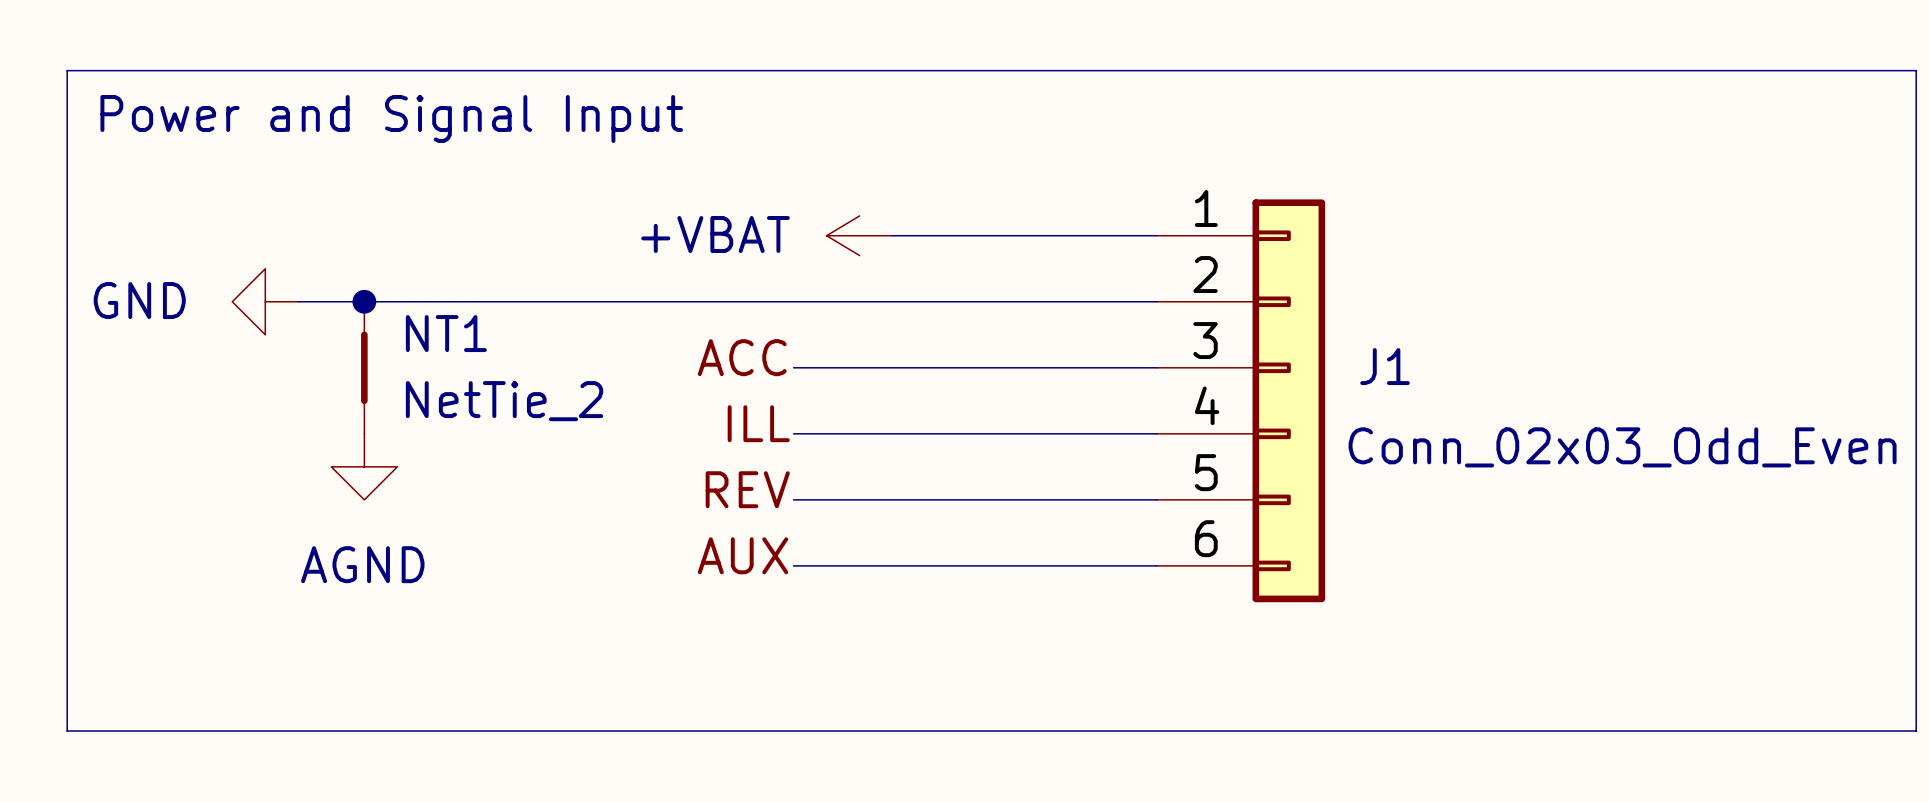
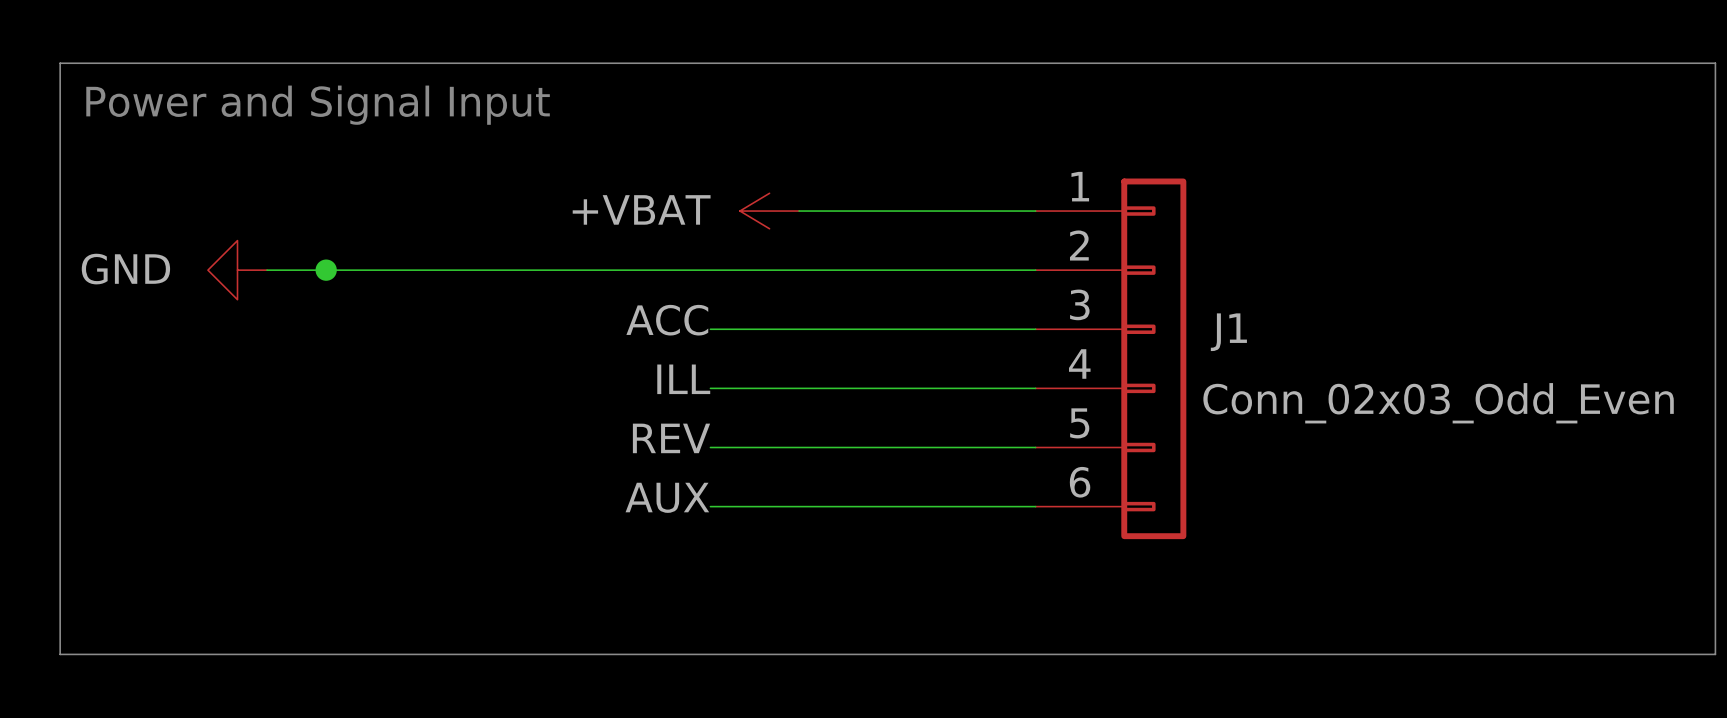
NT1: NetTie_2 (364, 367) -> none
power symbol: AGND (364, 466) -> none

